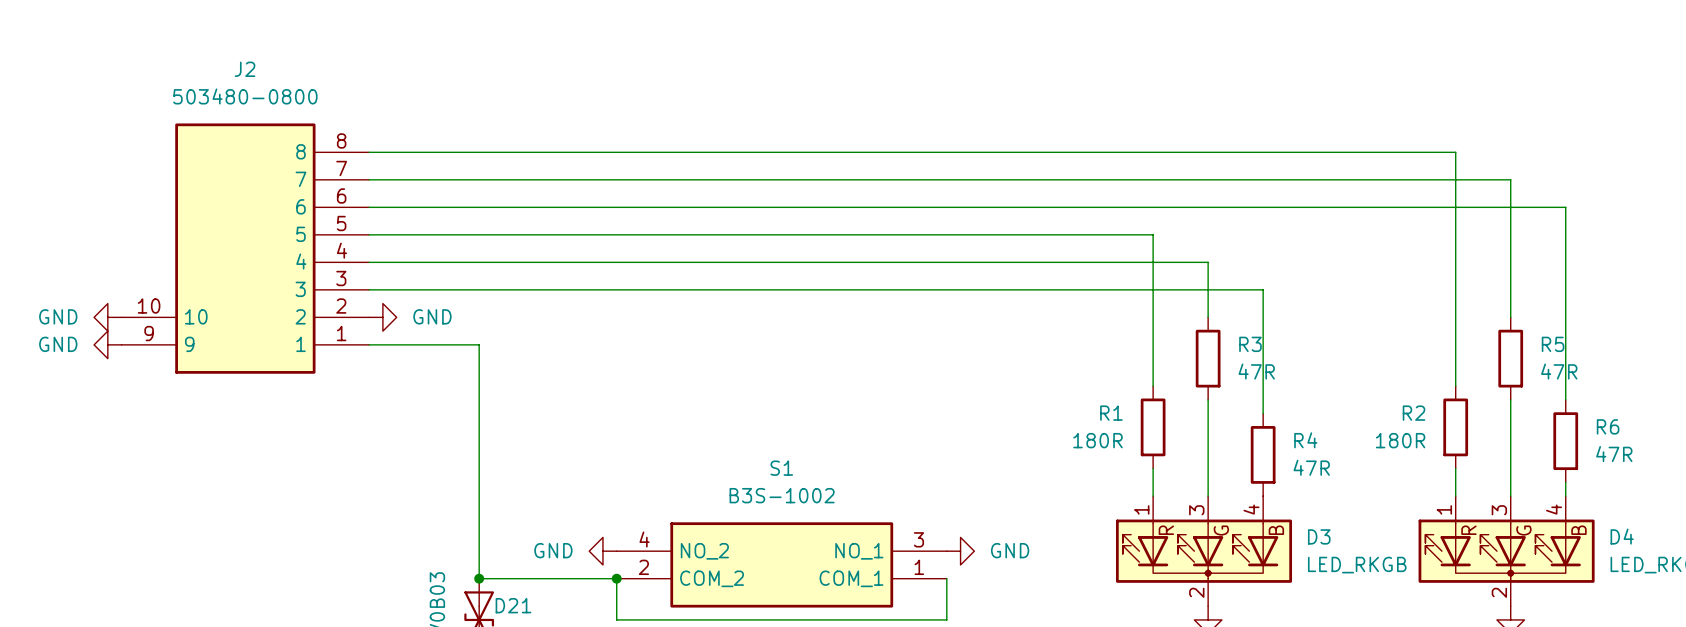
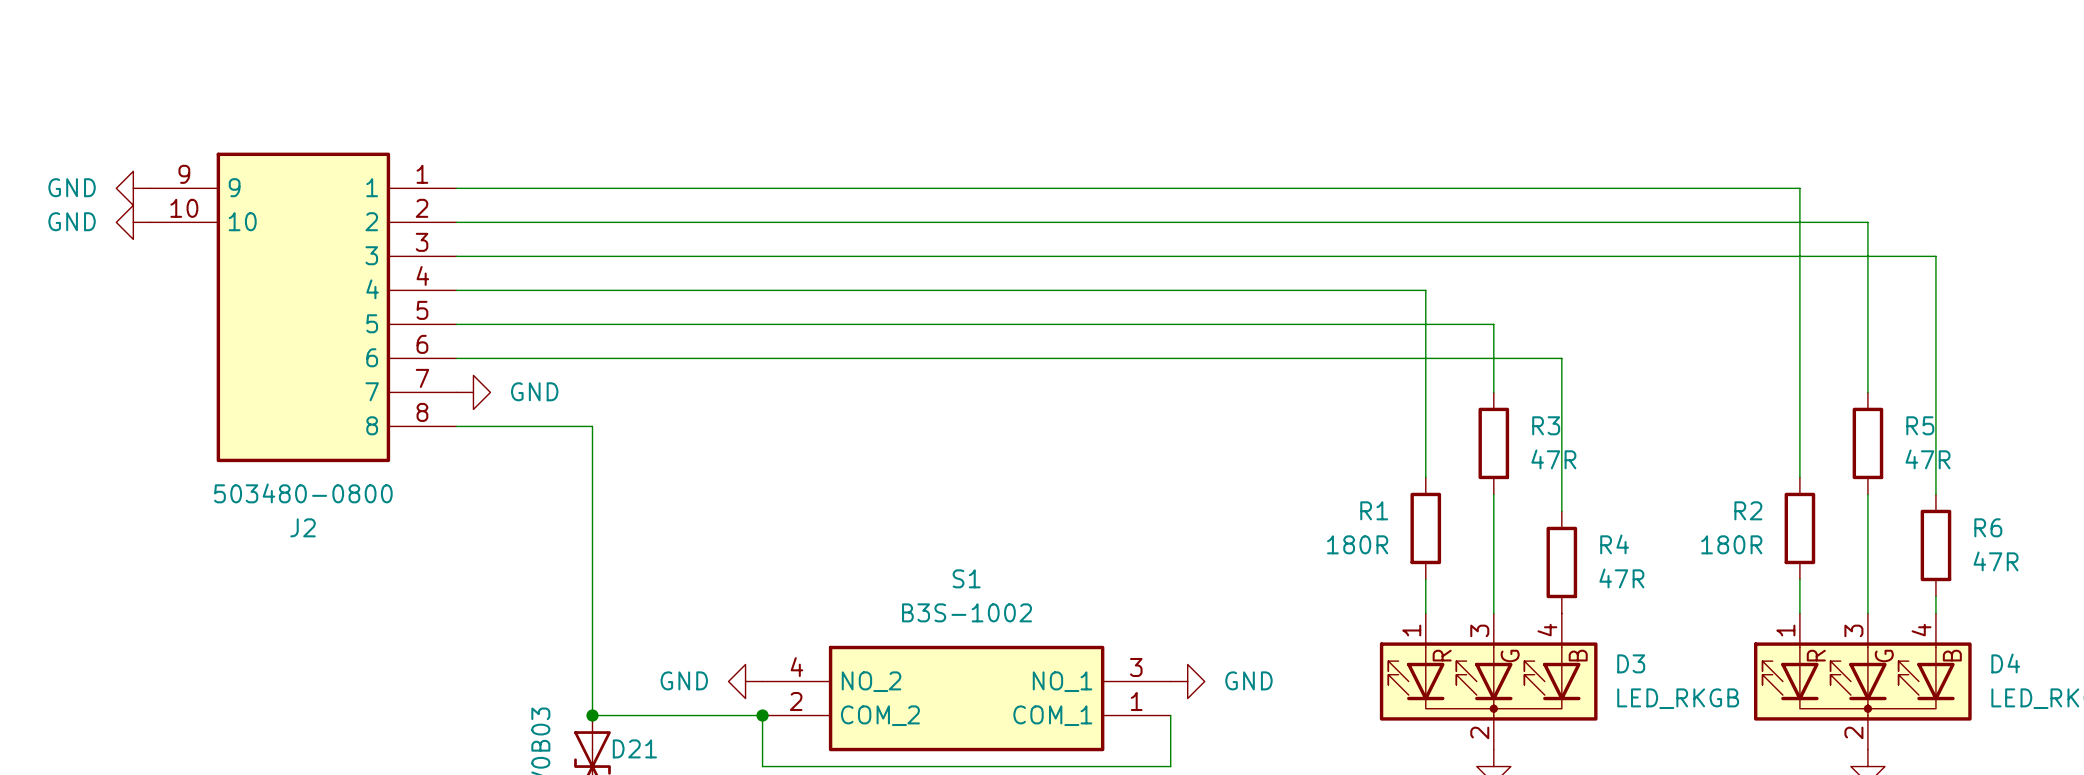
power symbol: none -> GND (133, 188)
power symbol: none -> GND (133, 222)
J2 flip: as is (245, 248) -> up-down (303, 307)
power symbol: GND (107, 317) -> none
power symbol: GND (107, 344) -> none

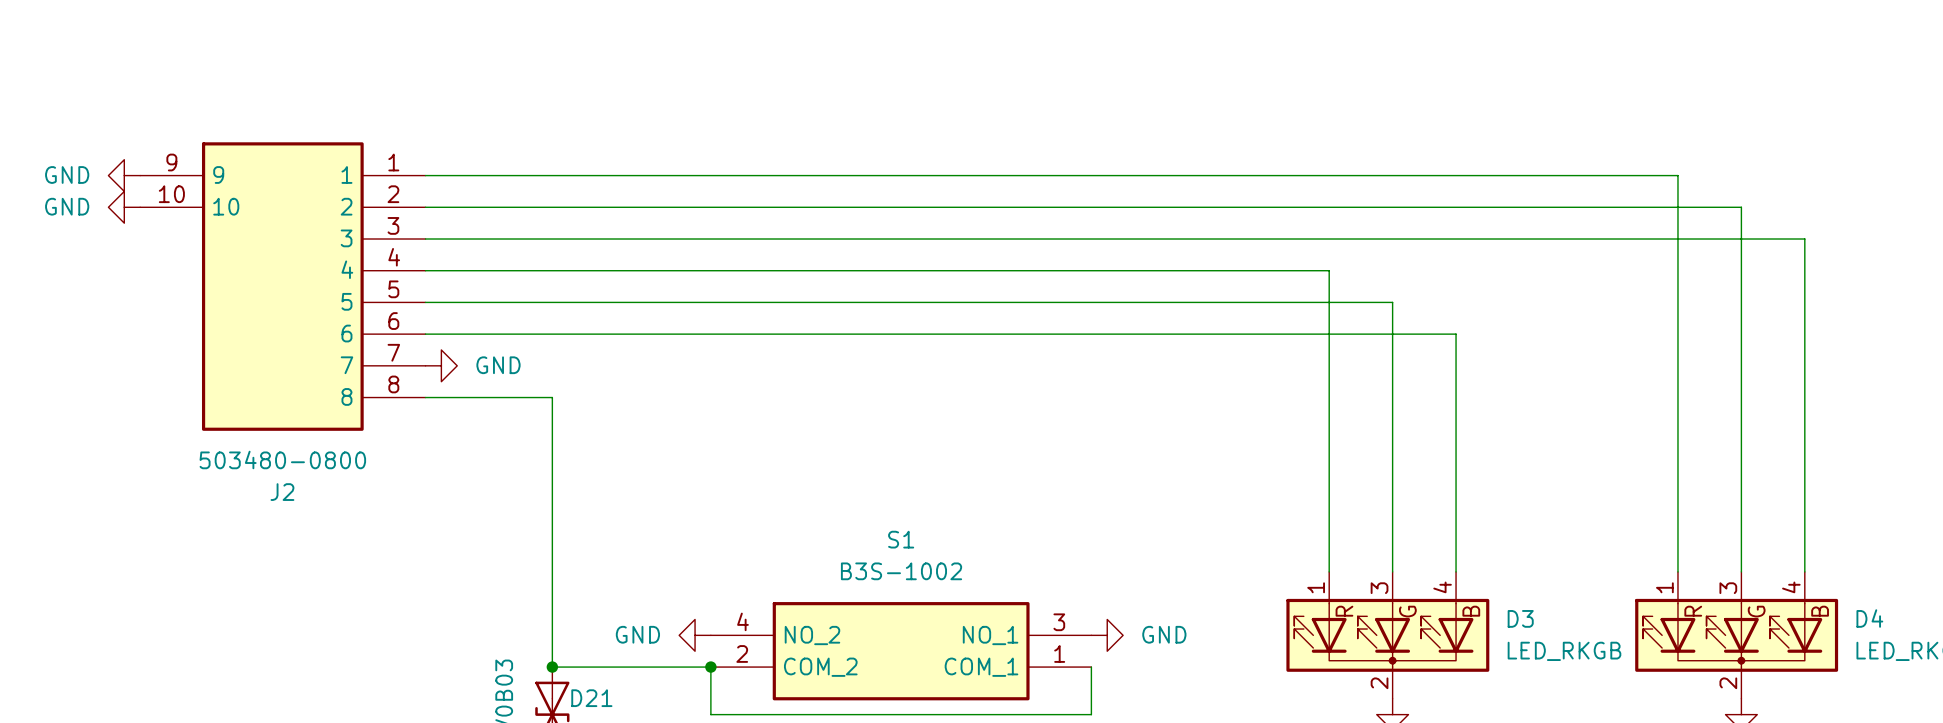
wire: none -> (1392, 365) (1392, 460)
wire: none -> (1741, 365) (1741, 460)
R3: 47R (1493, 443) -> none
R5: 47R (1867, 443) -> none
wire: none -> (1329, 445) (1329, 540)
wire: none -> (1677, 445) (1677, 540)
wire: none -> (1804, 460) (1804, 556)
wire: none -> (1456, 476) (1456, 571)
R1: 180R (1425, 528) -> none
R2: 180R (1799, 528) -> none
R6: 47R (1935, 545) -> none
R4: 47R (1561, 562) -> none

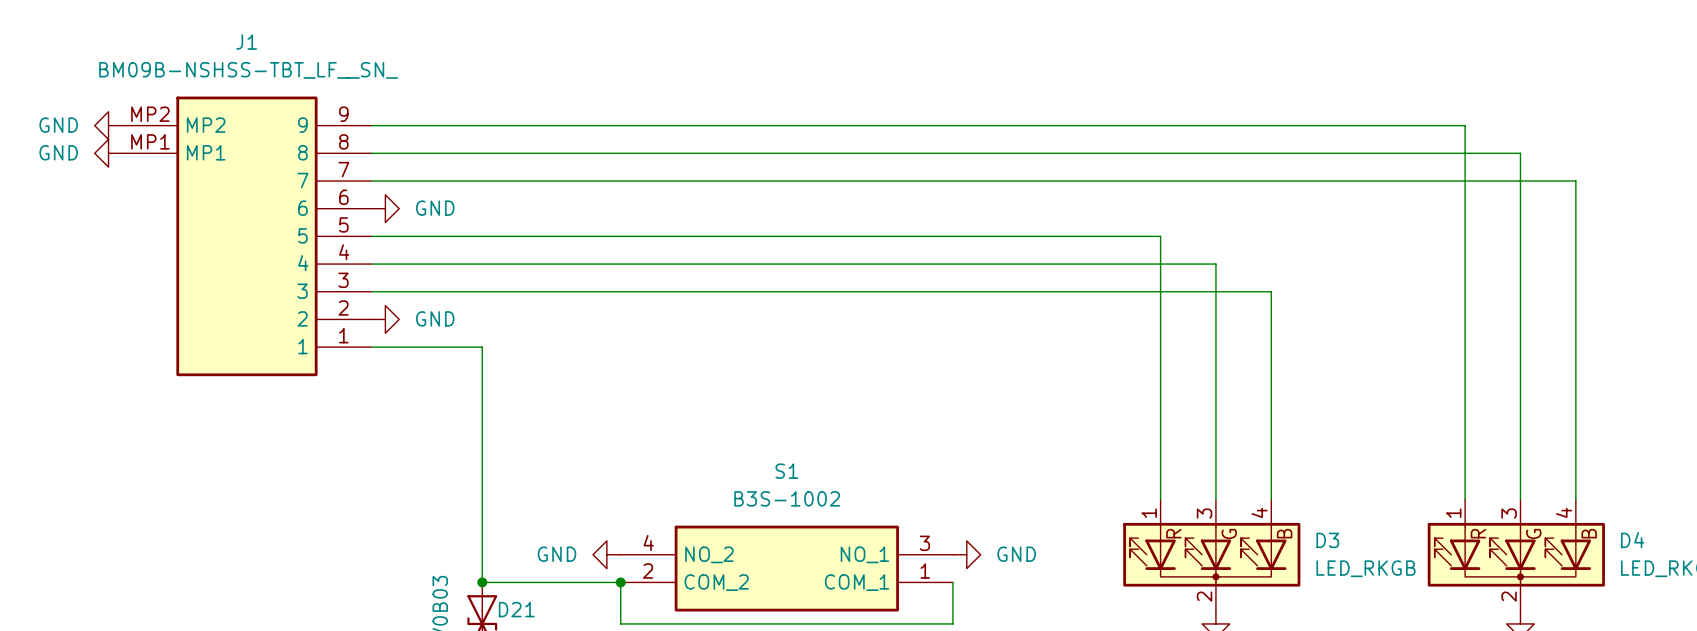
power symbol position: GND (124, 207) -> GND (108, 125)
wire: (425, 239) (1804, 239) -> (371, 125) (1465, 125) (1465, 153) (1520, 153) (1520, 180) (1575, 180) (1575, 208)
power symbol: none -> GND (385, 208)
J1: none -> BM09B-NSHSS-TBT_LF__SN_ (246, 236)
J2: 503480-0800 (282, 286) -> none

